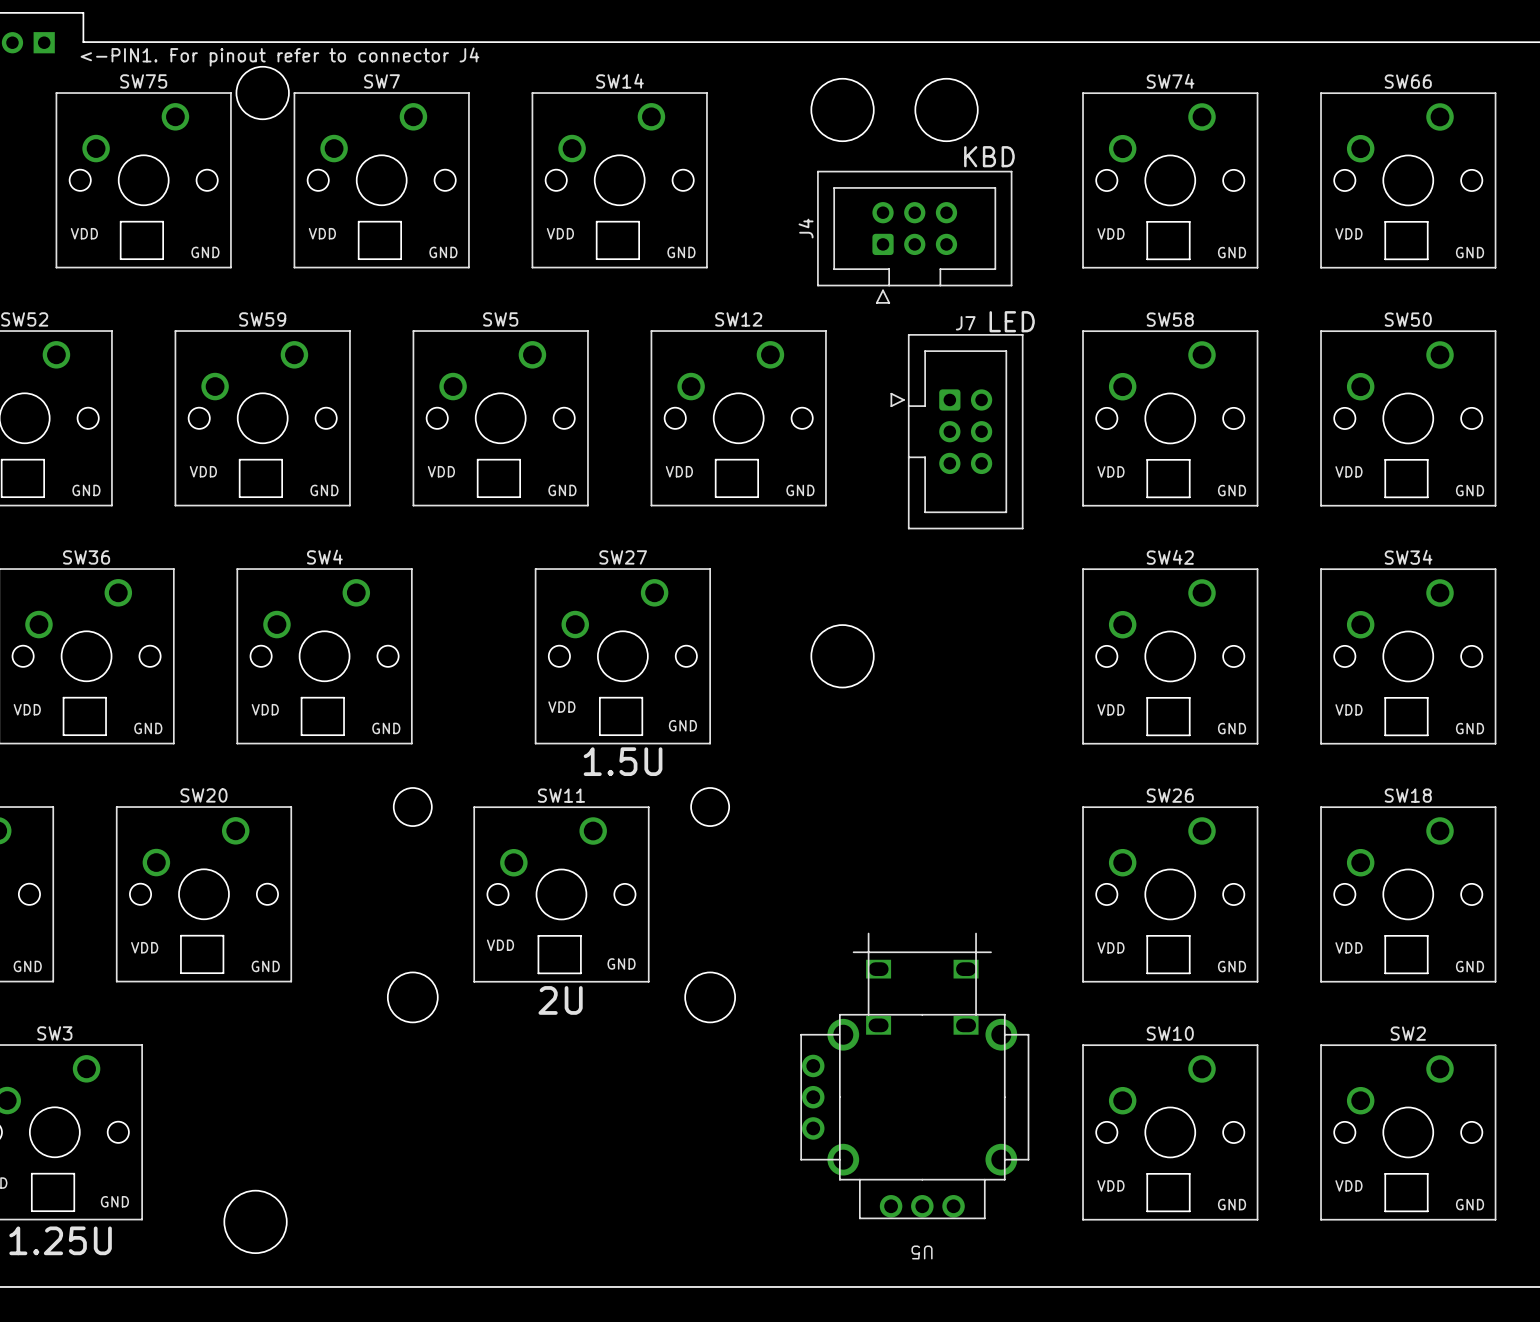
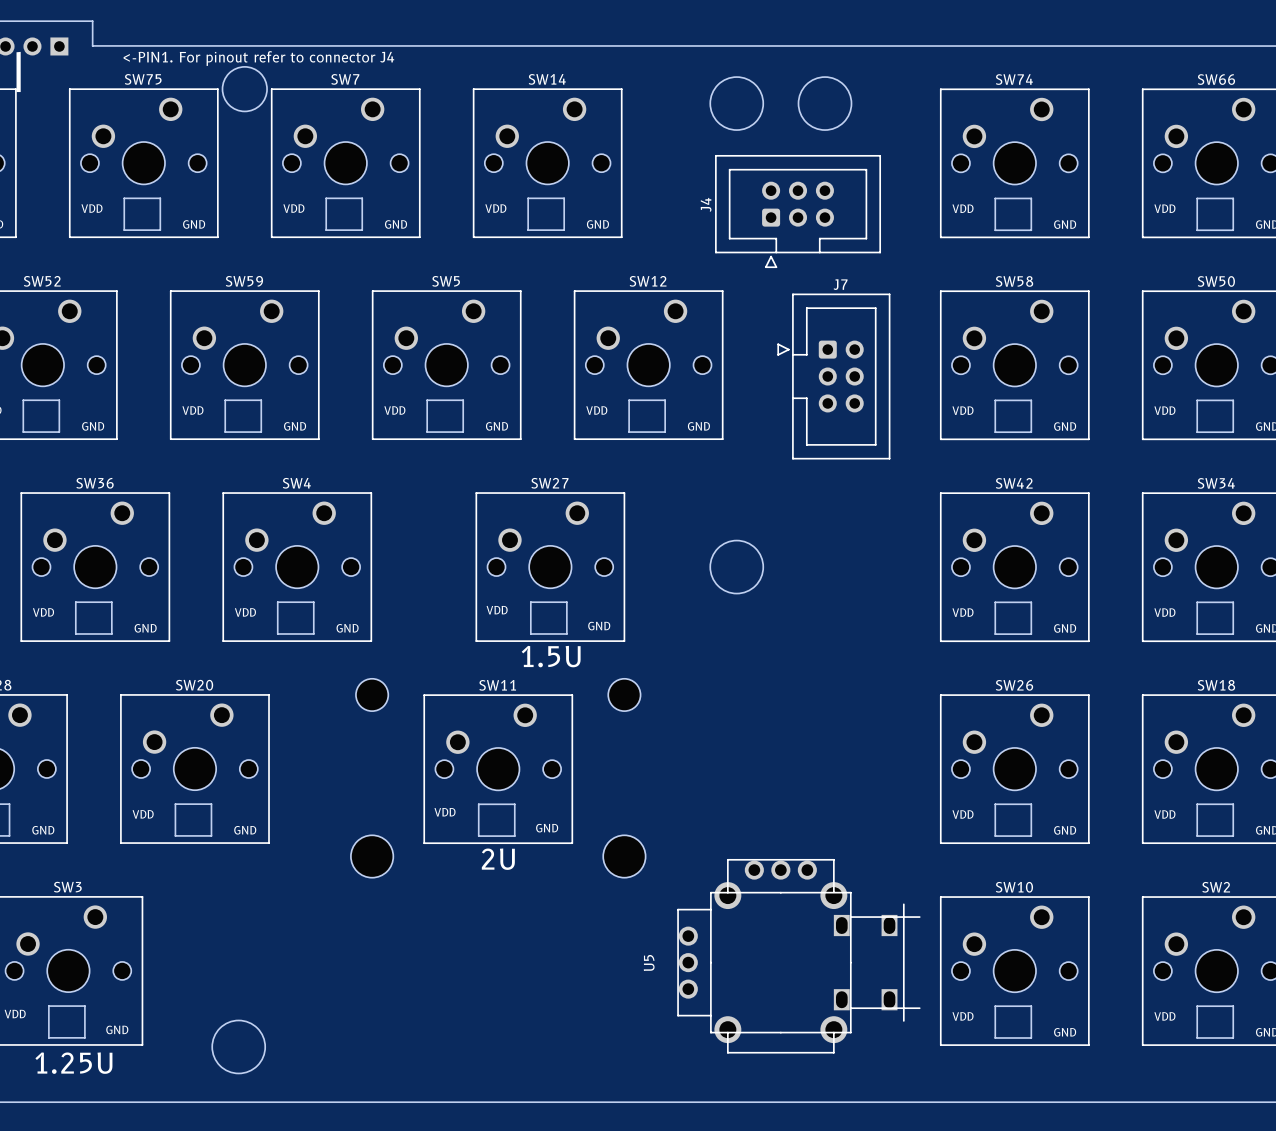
text: KBD (989, 156) -> none
text: LED (1012, 321) -> none
U5 rotation: 0° (914, 1075) -> 90° clockwise (798, 956)

